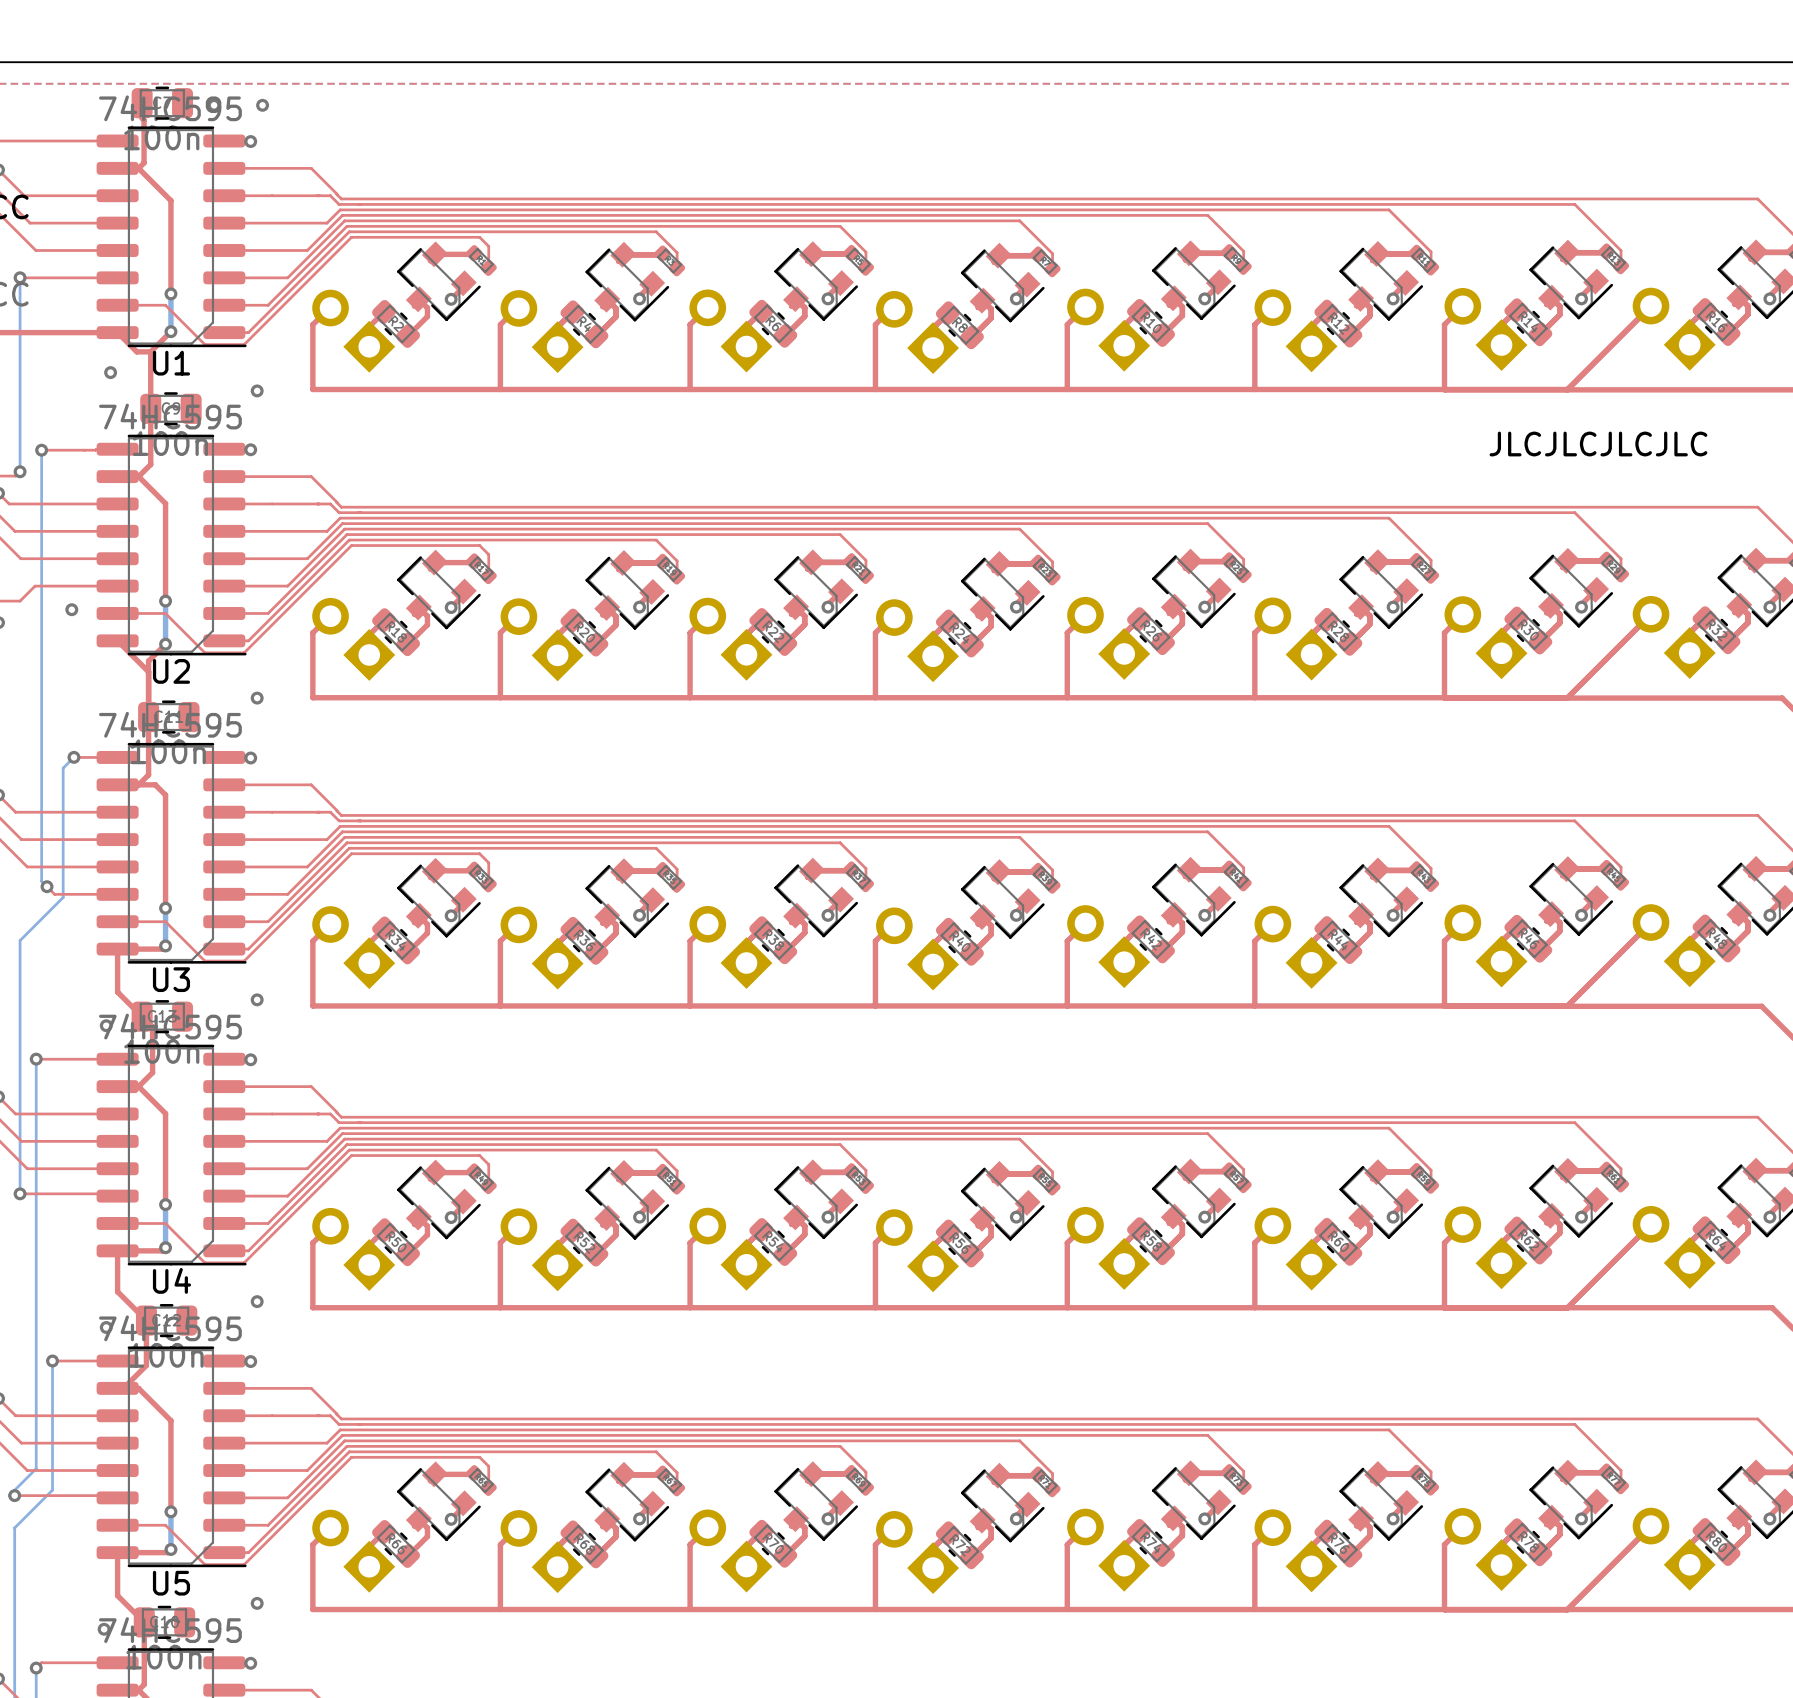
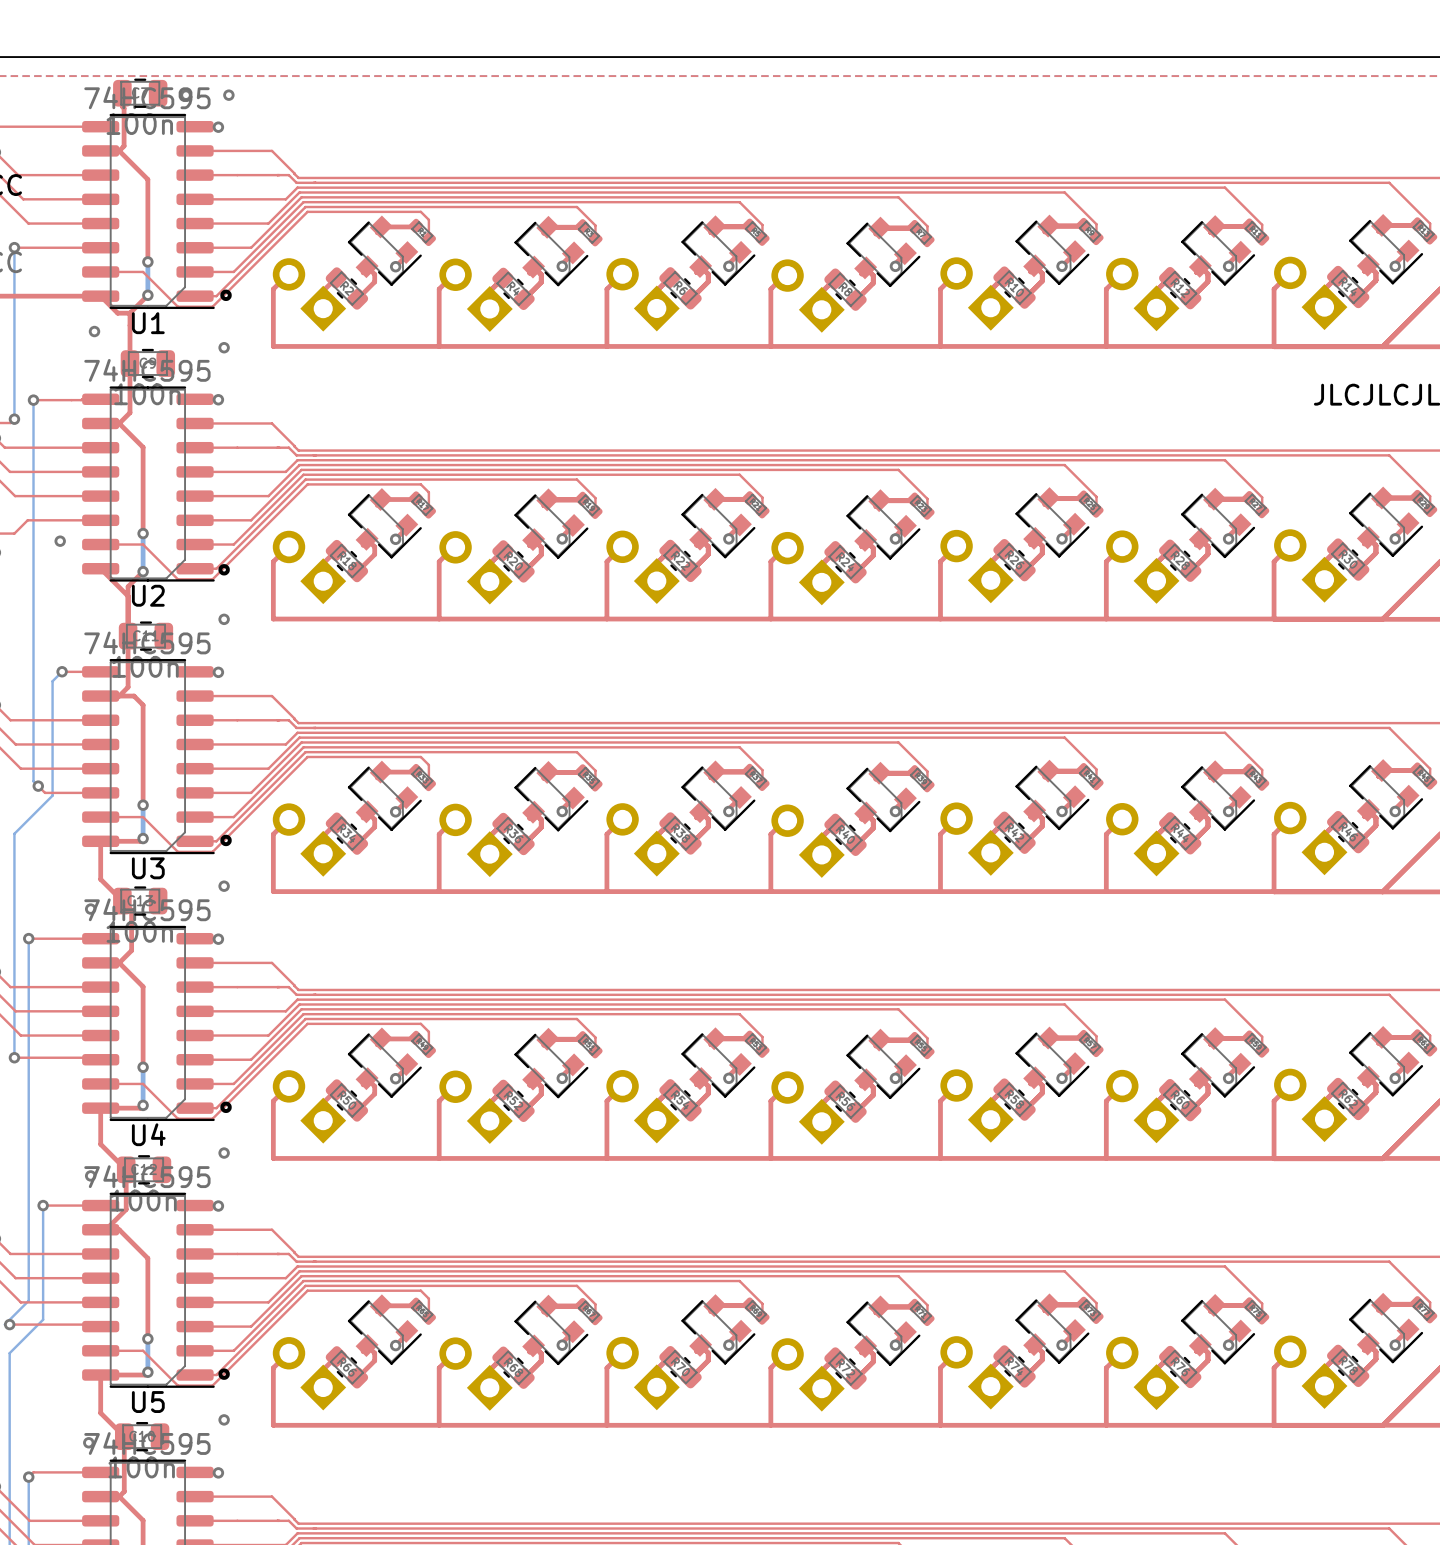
drawing: none -> [220, 289, 232, 302]
drawing: none -> [218, 564, 230, 576]
drawing: none -> [220, 834, 232, 847]
drawing: none -> [220, 1101, 232, 1114]
drawing: none -> [218, 1368, 230, 1380]

